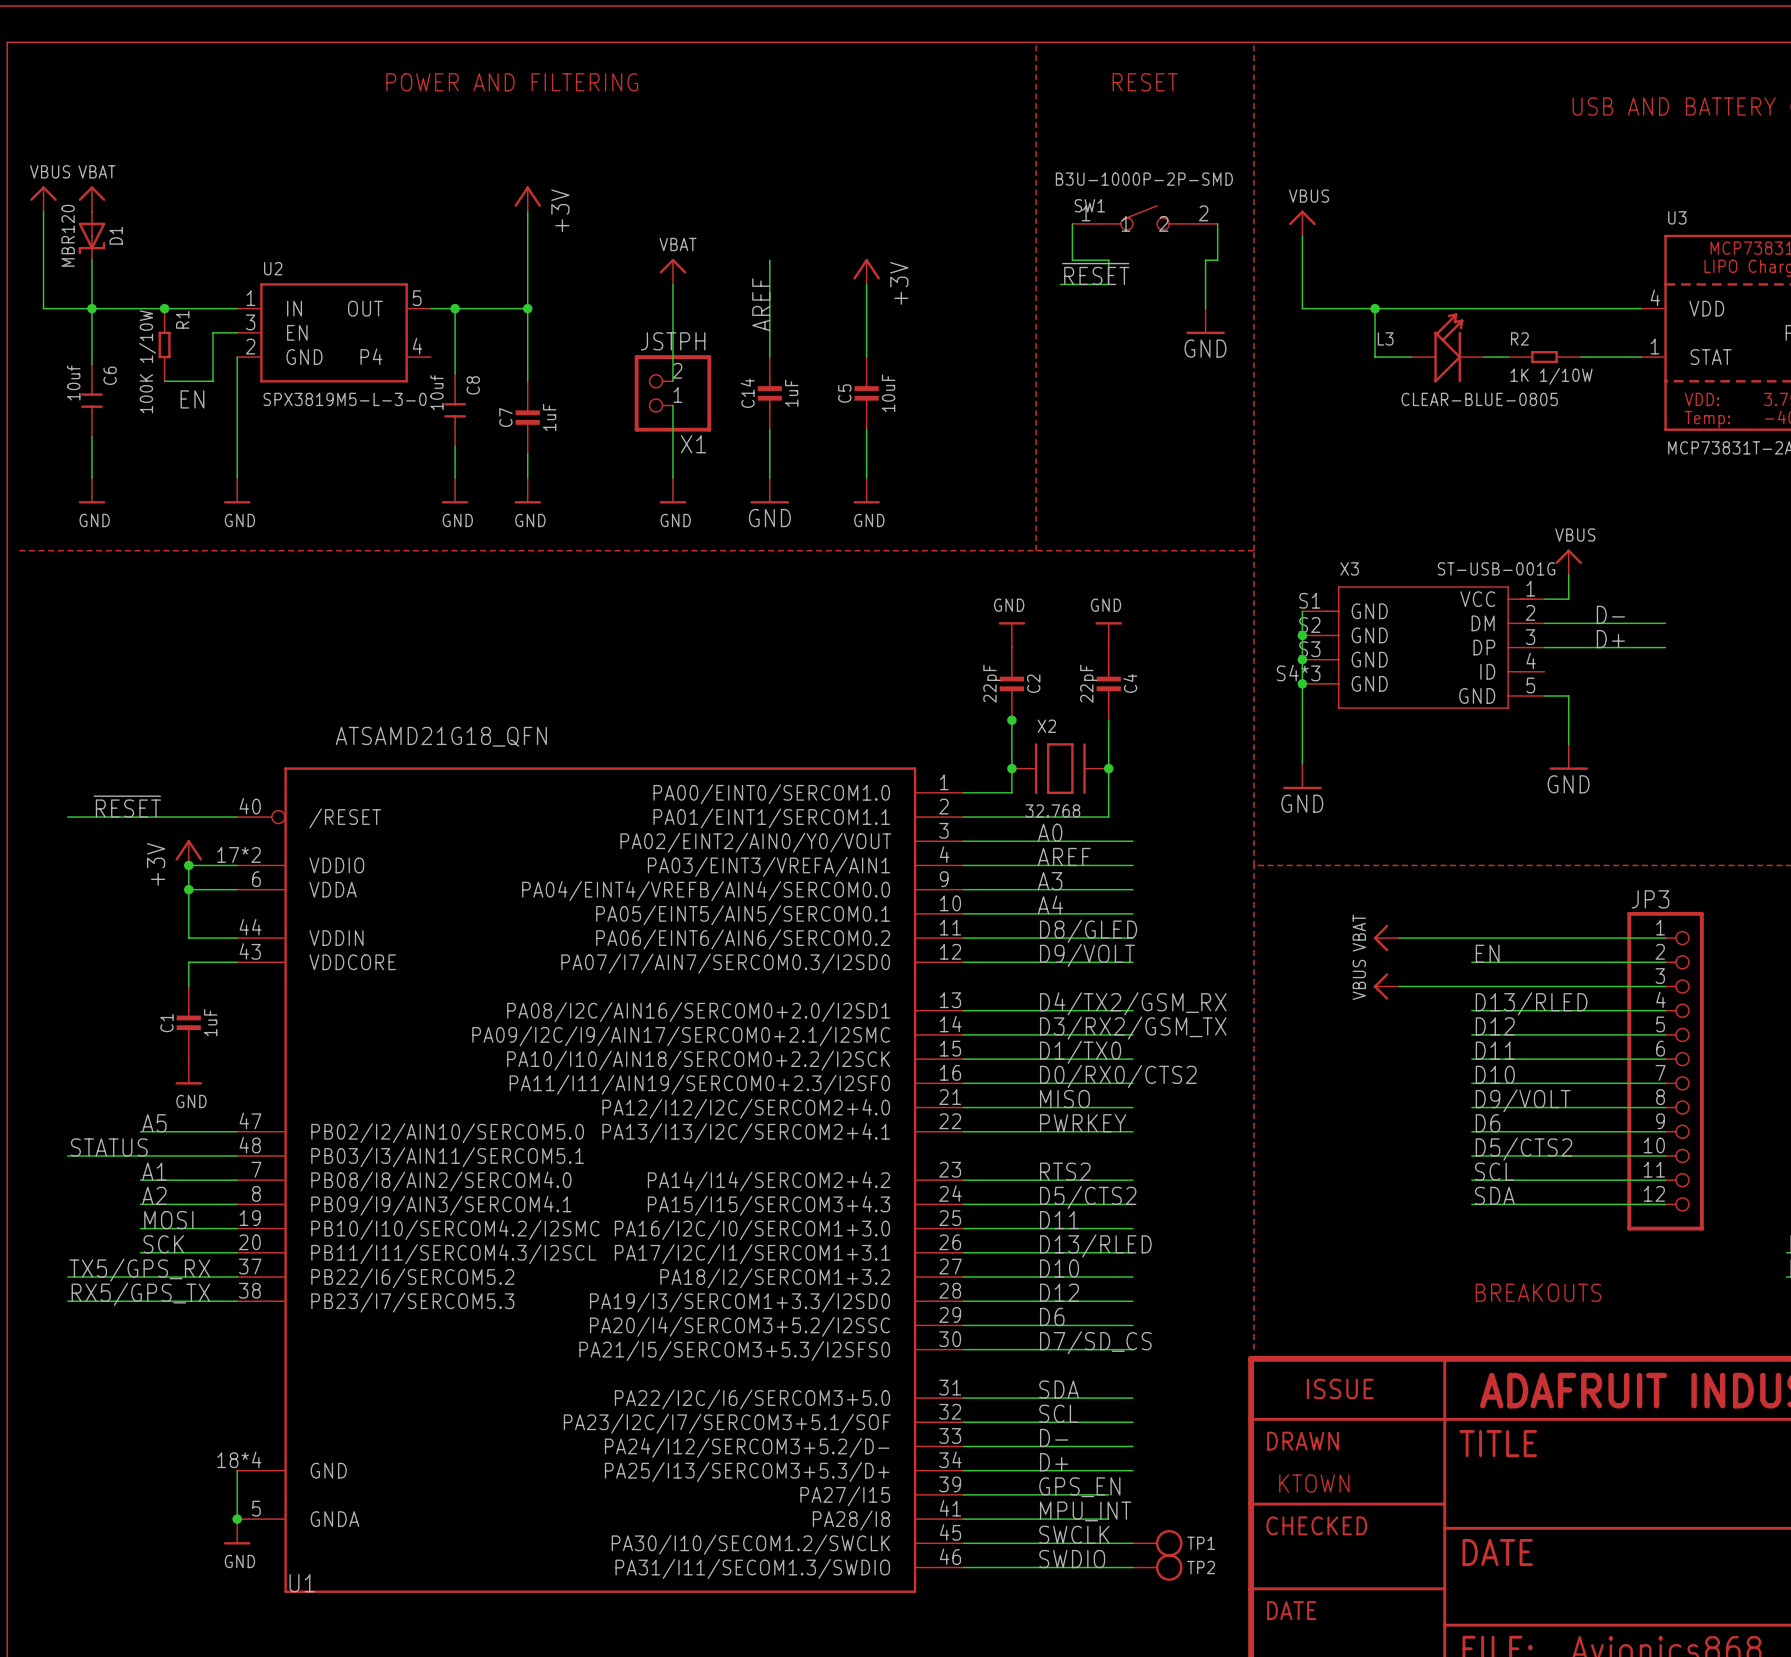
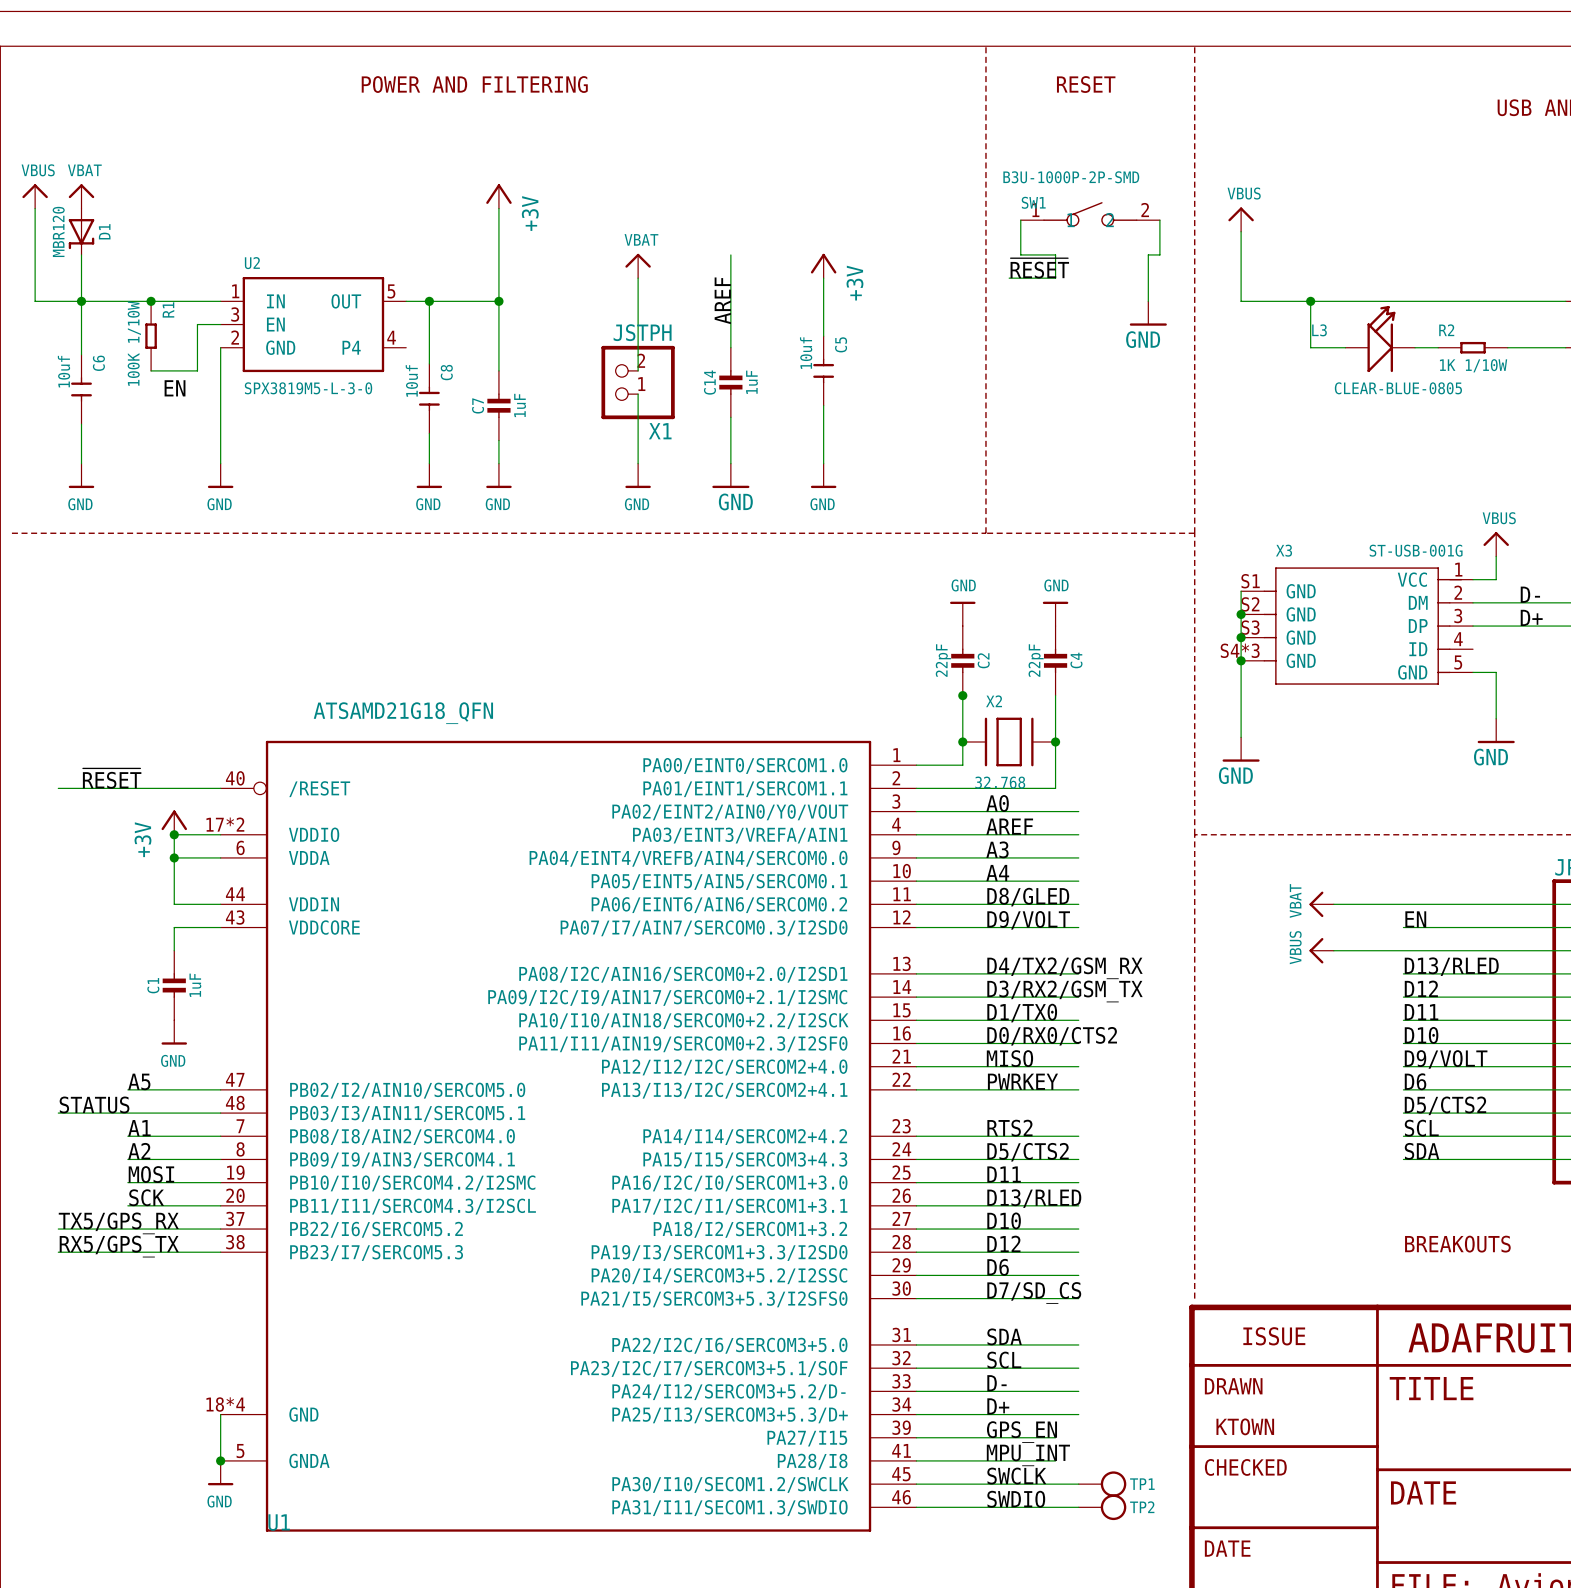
C5 symbol: [854, 357, 879, 430] -> [813, 336, 835, 406]
C5 name position: C5 (844, 393) -> C5 (841, 344)
C5 value: 10uF (888, 393) -> 10uf (806, 353)

